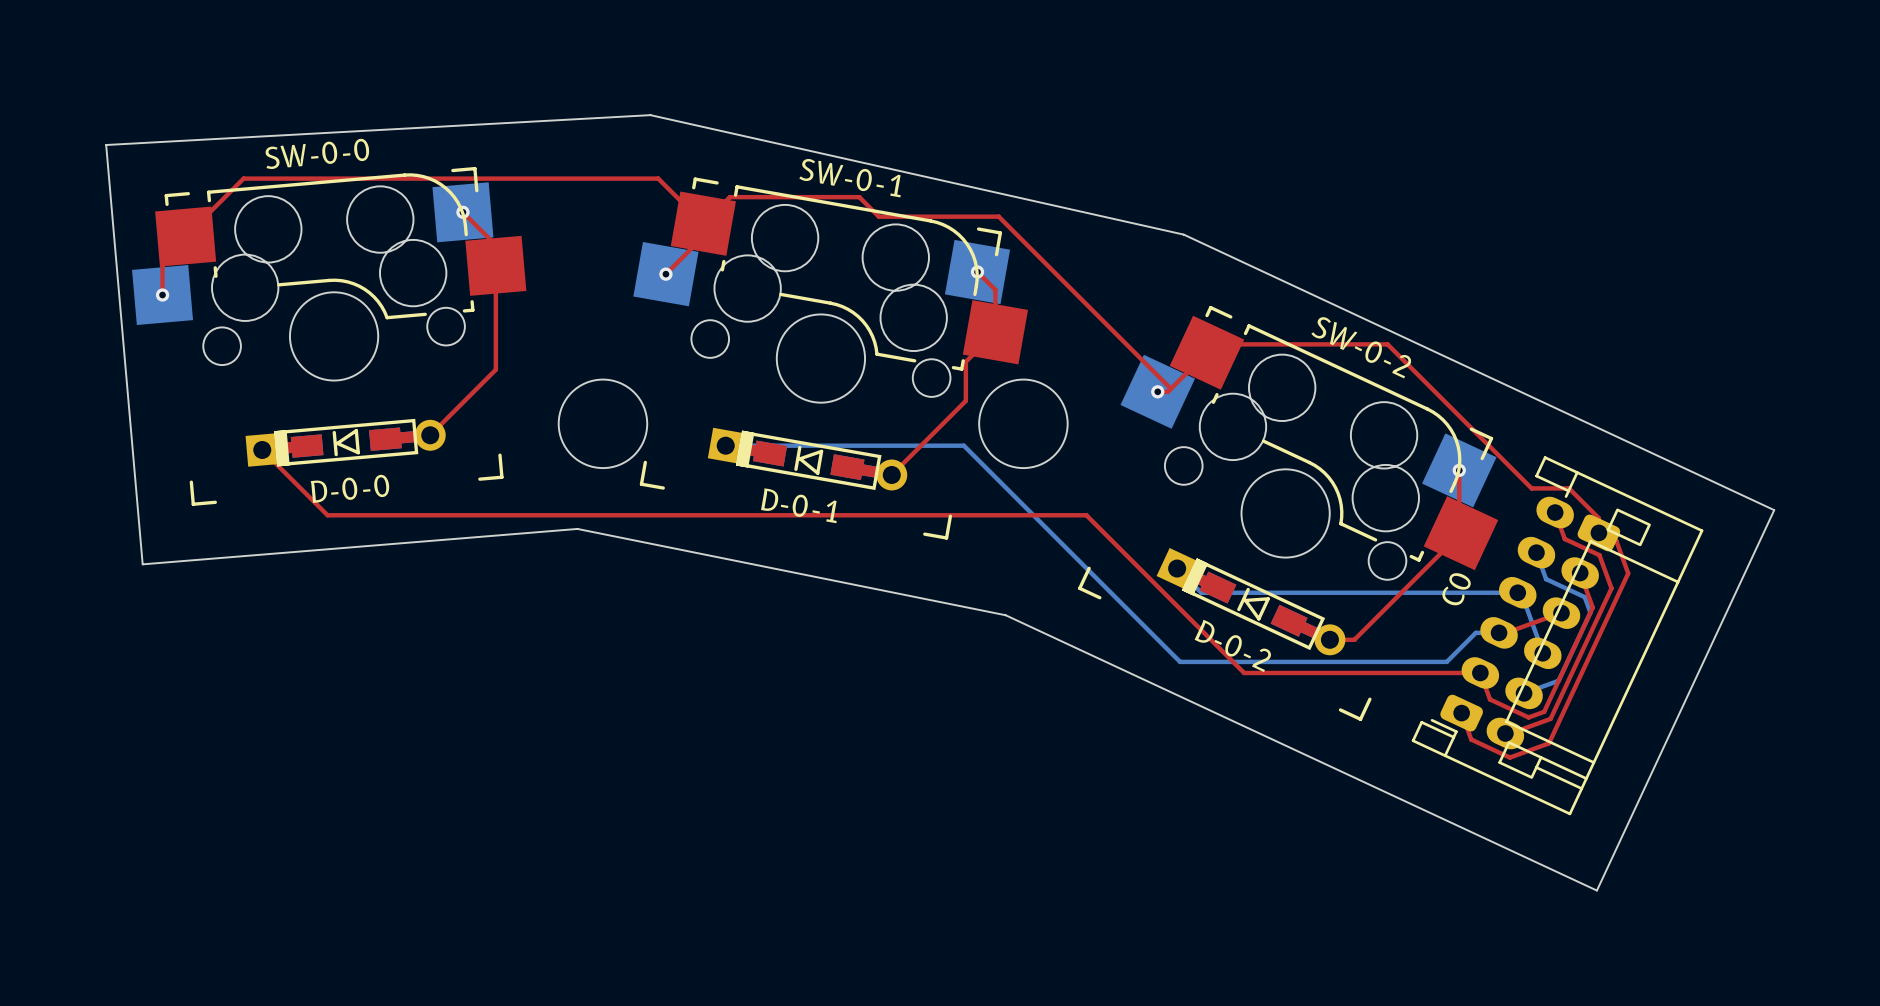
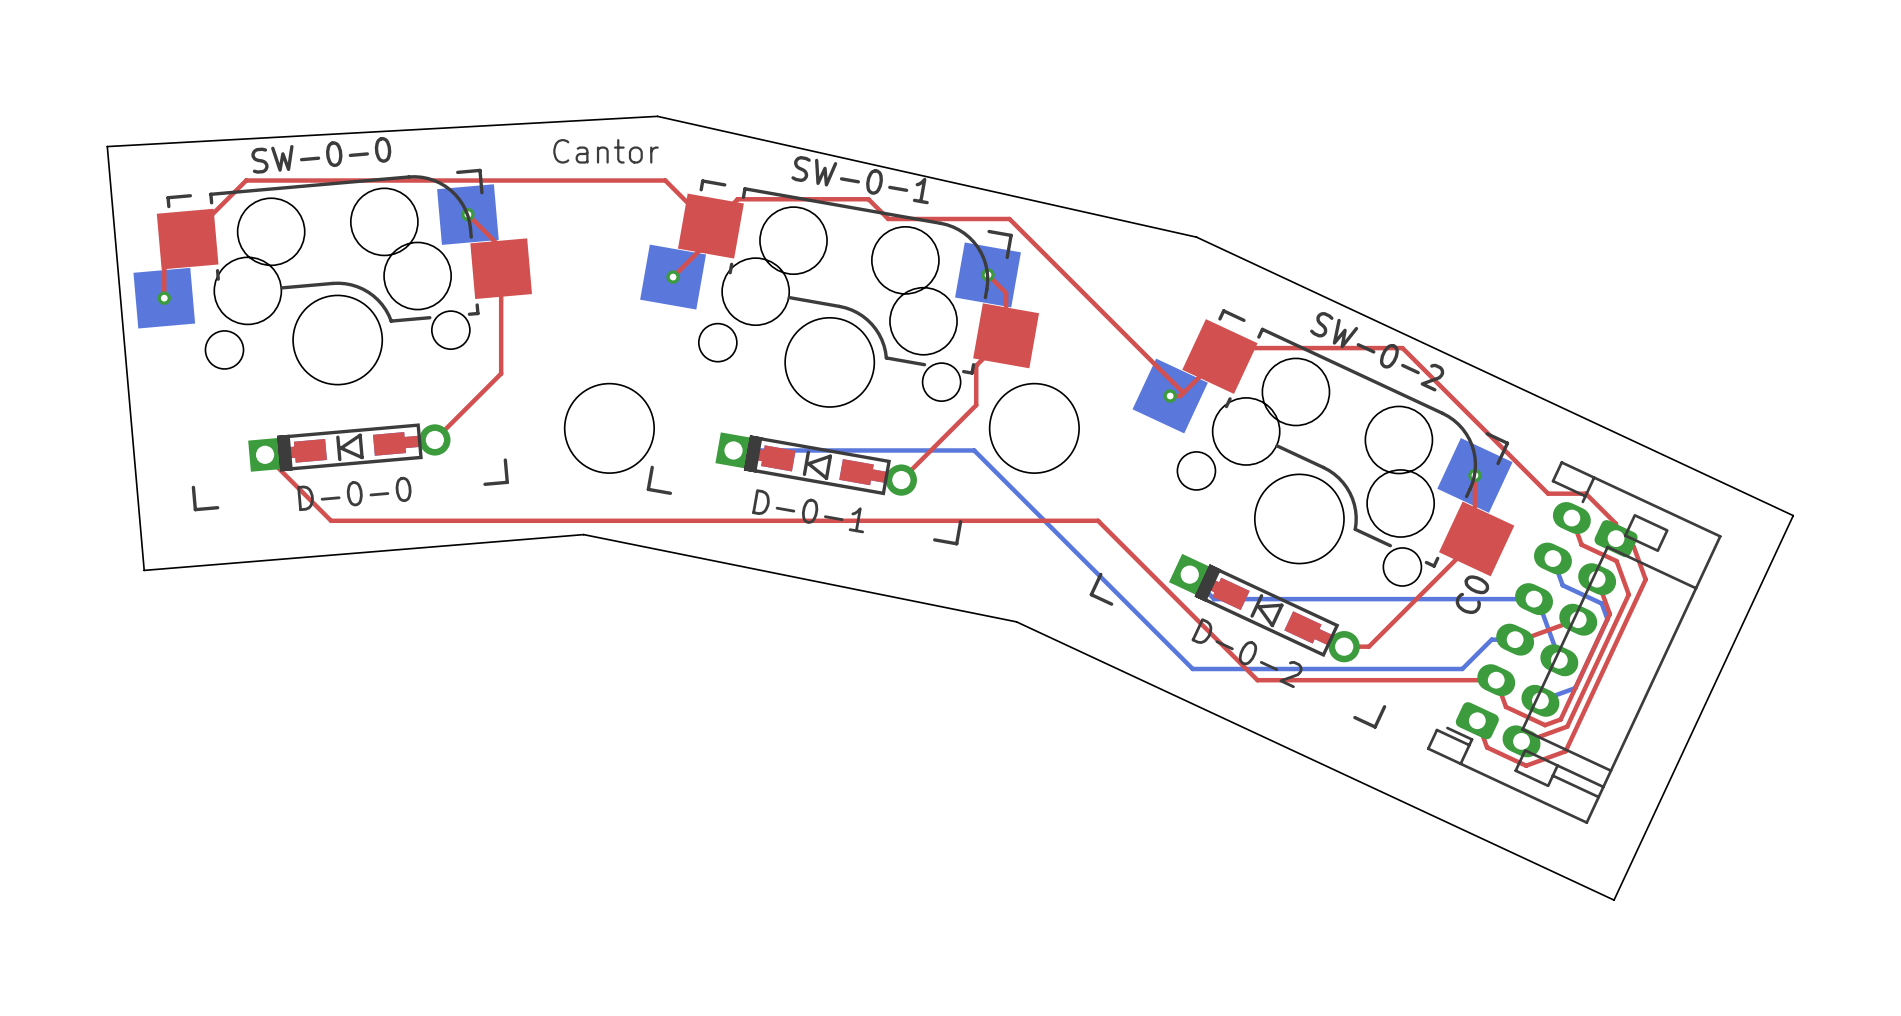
text: none -> Cantor (606, 151)

